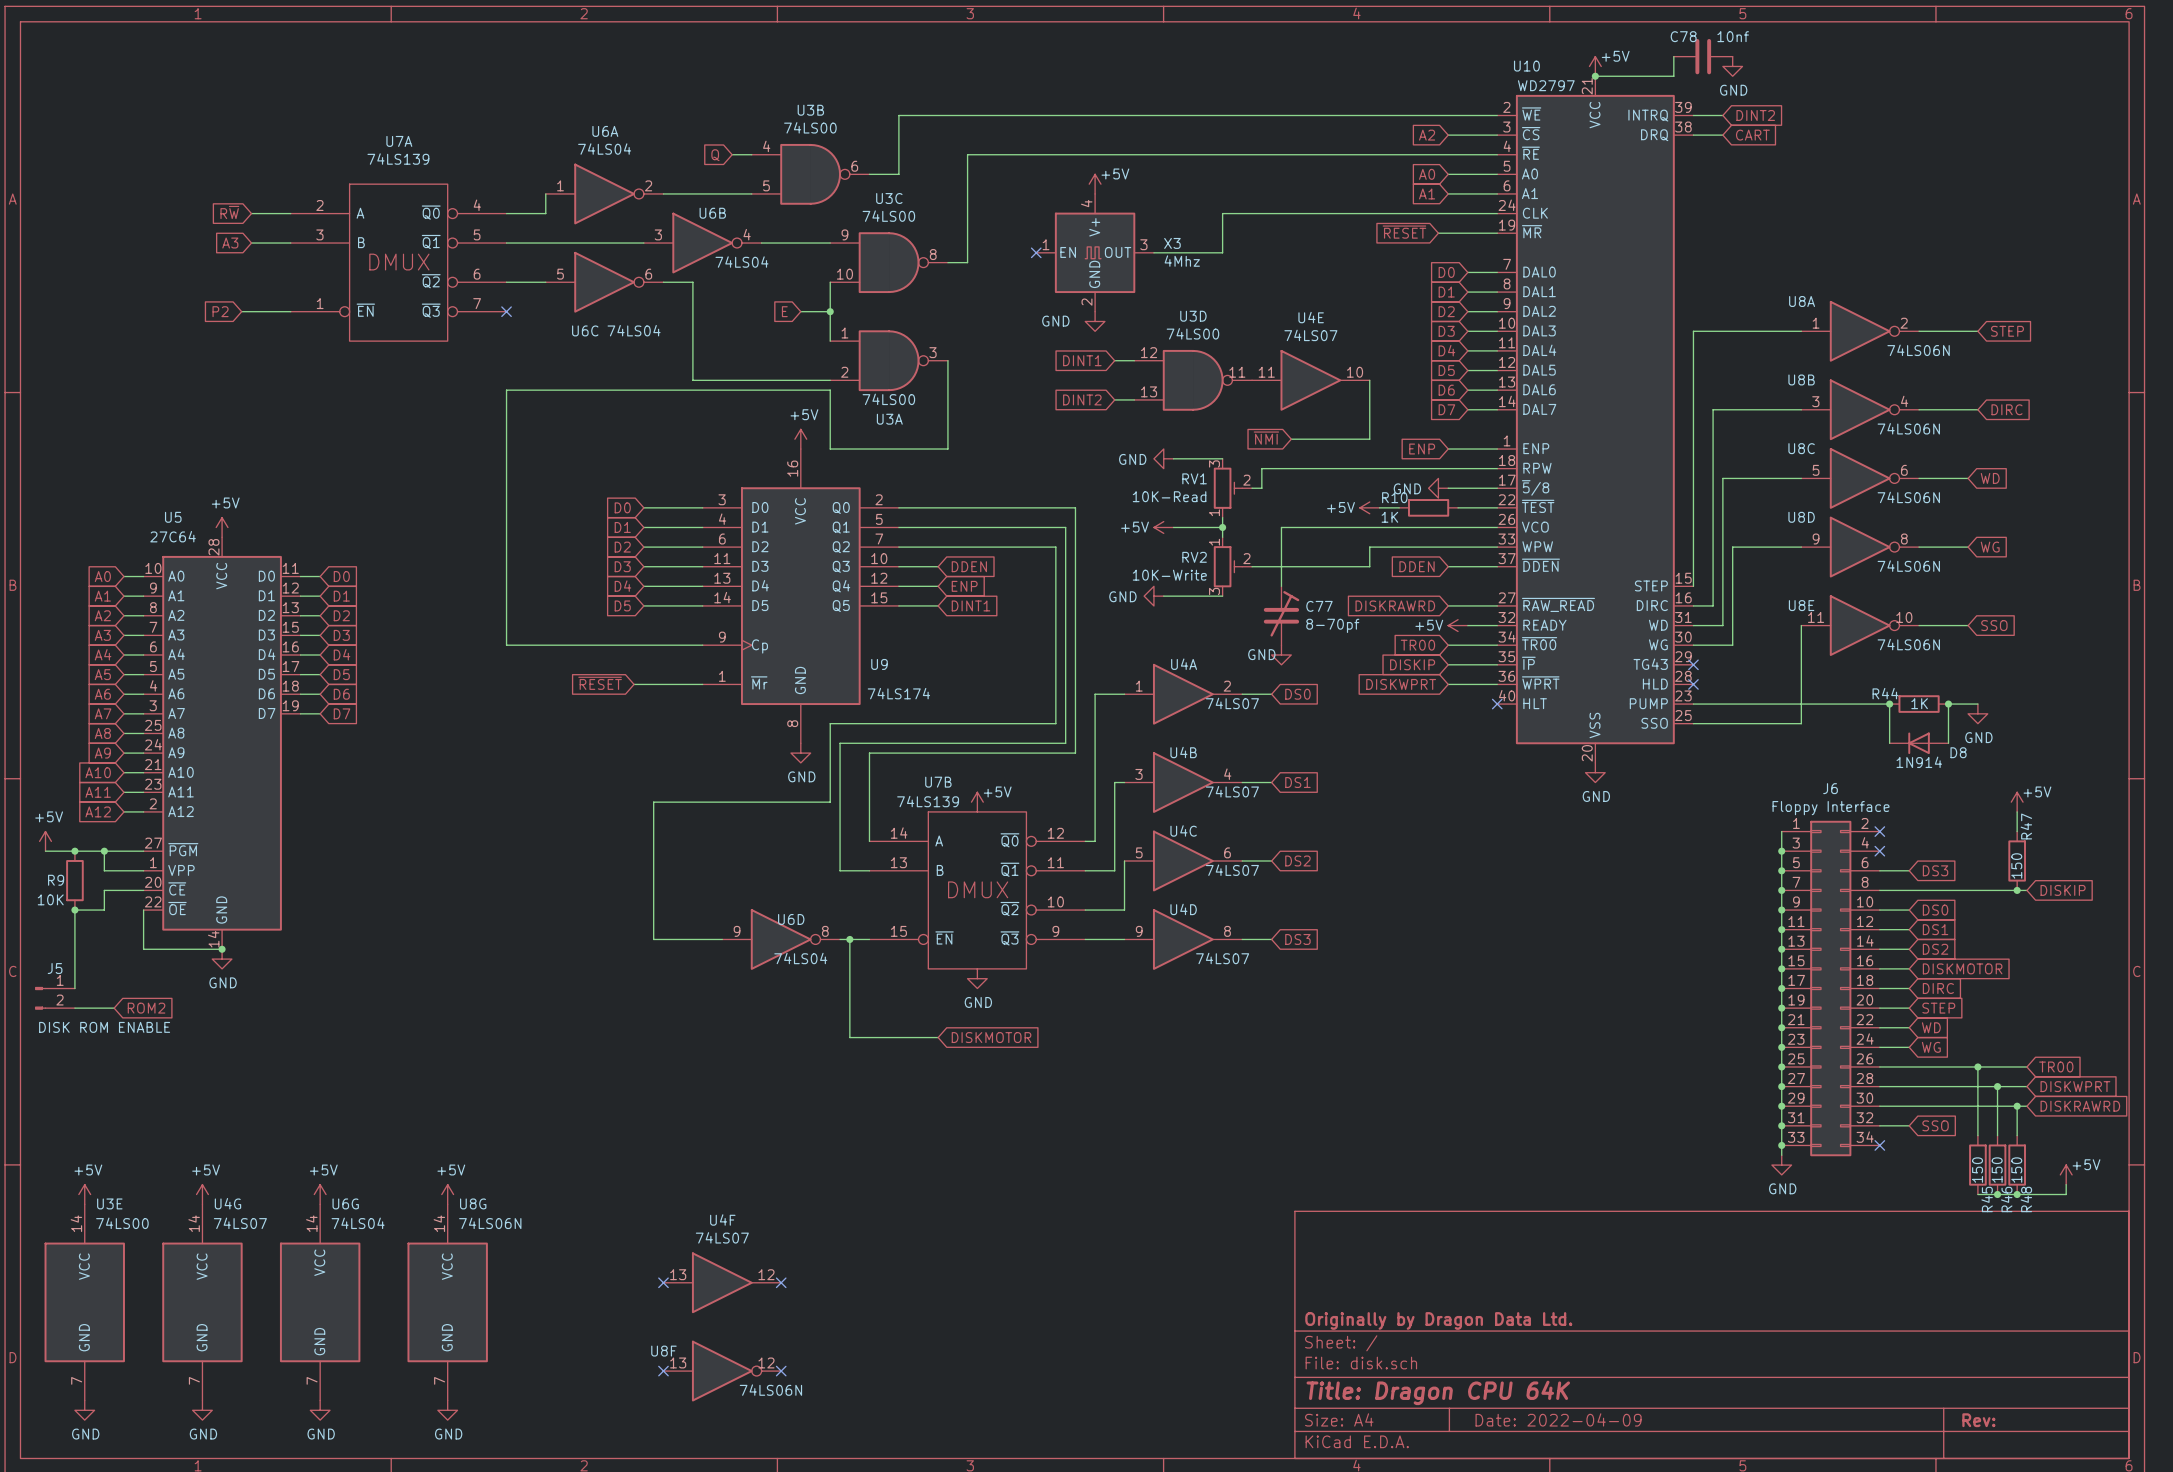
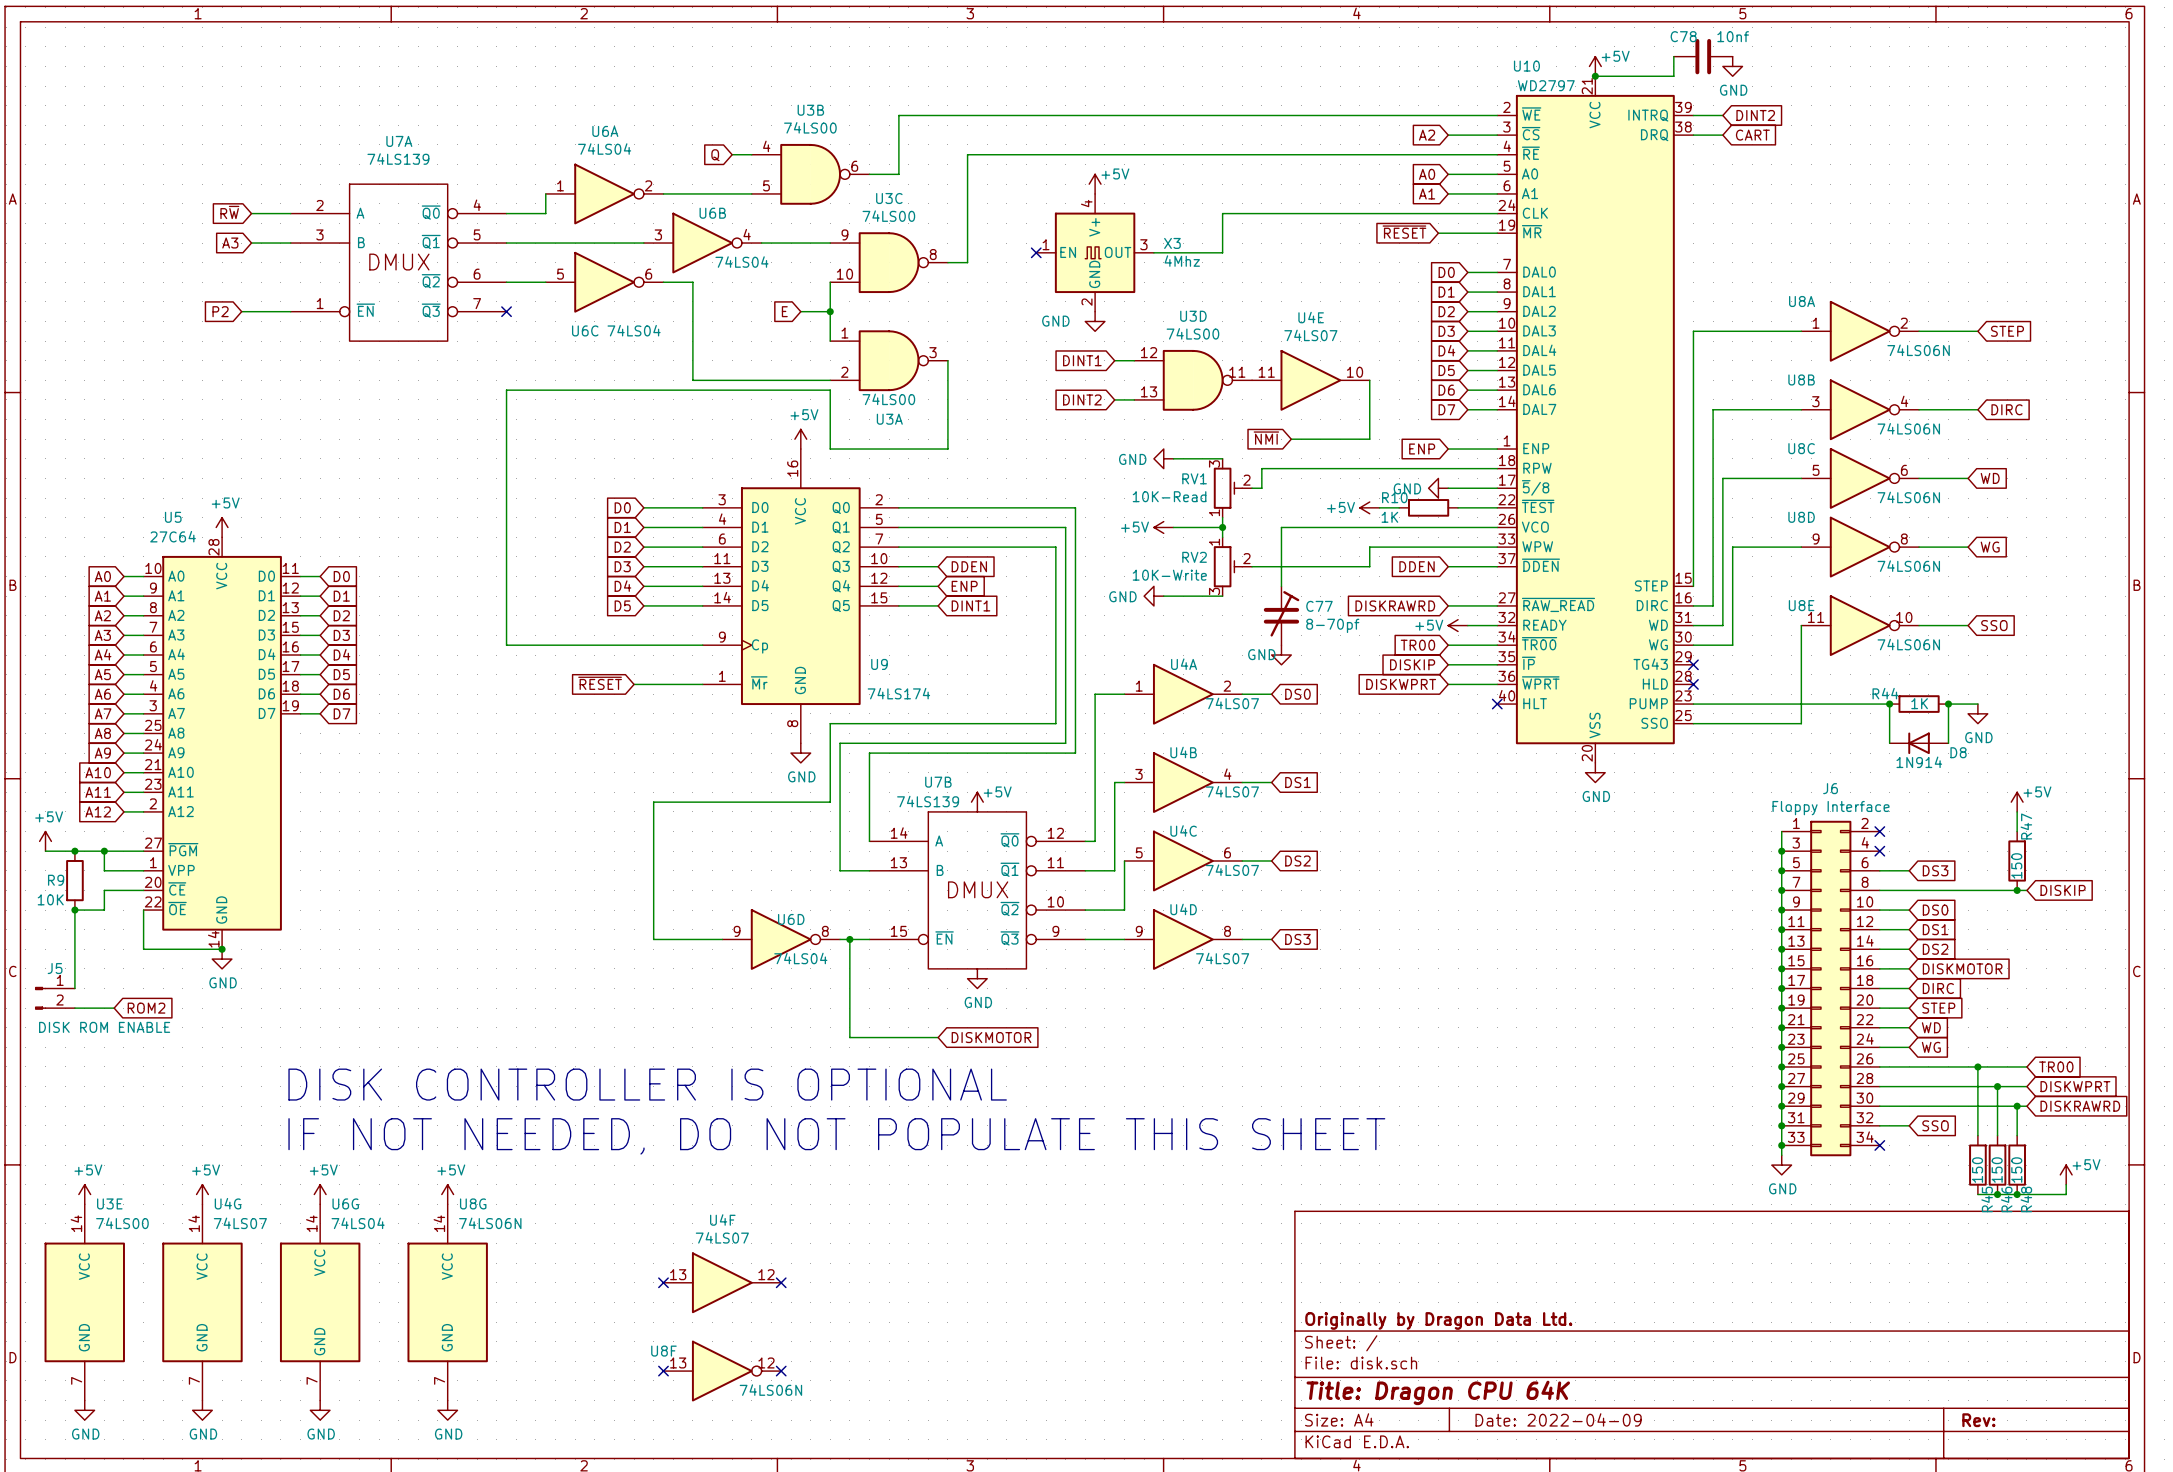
text: none -> DISK CONTROLLER IS OPTIONAL (647, 1084)
text: none -> IF NOT NEEDED, DO NOT POPULATE THIS SHEET (836, 1136)

